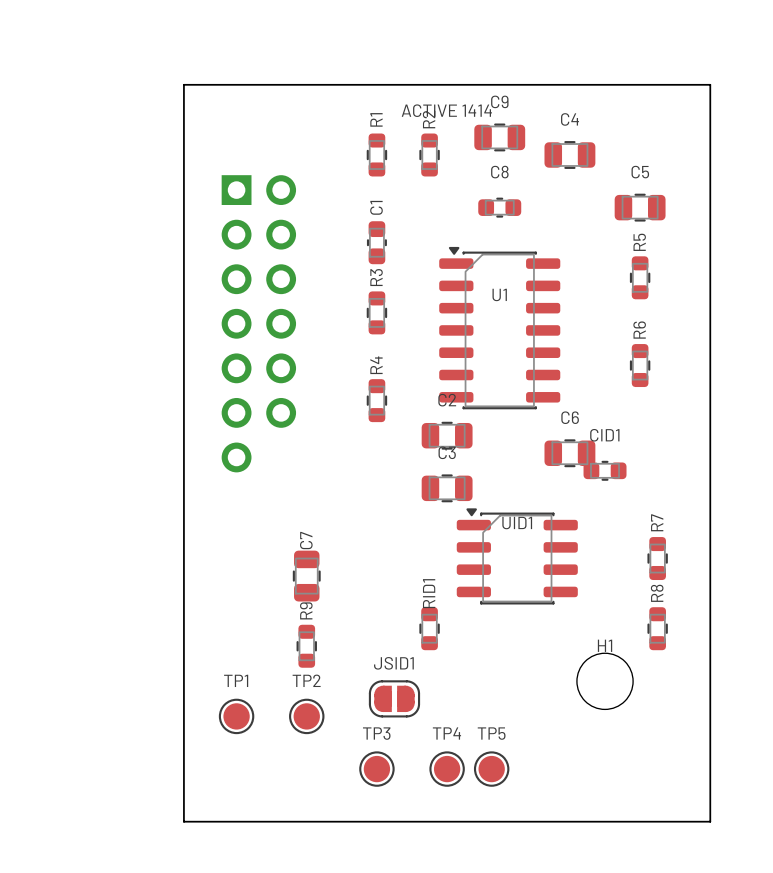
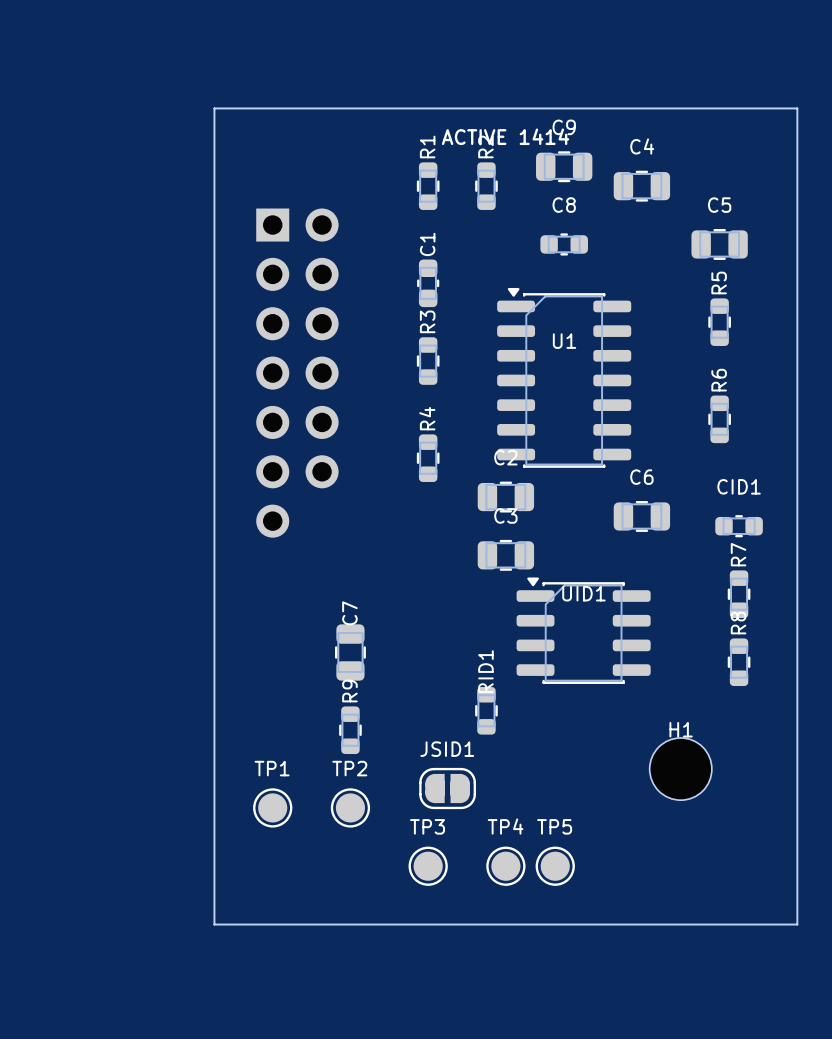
CID1 position: (605, 470) -> (739, 526)
R7 position: (657, 558) -> (739, 594)
R8 position: (657, 628) -> (739, 662)

